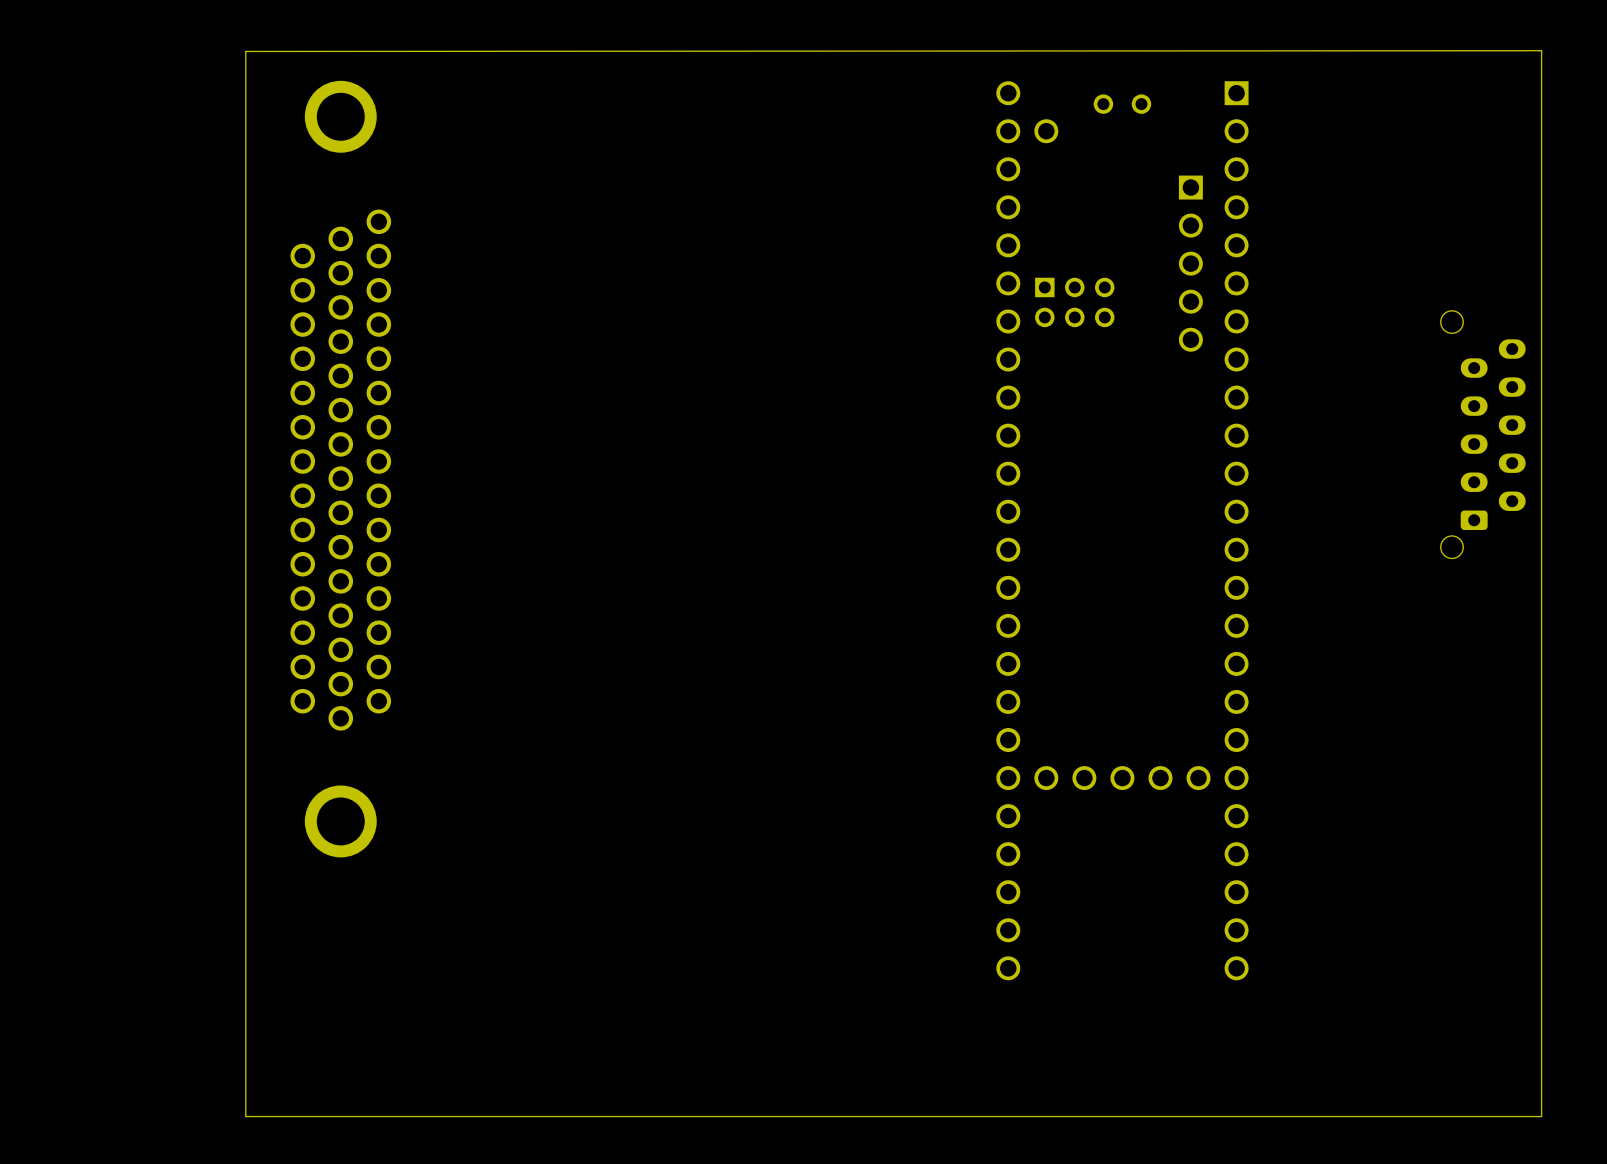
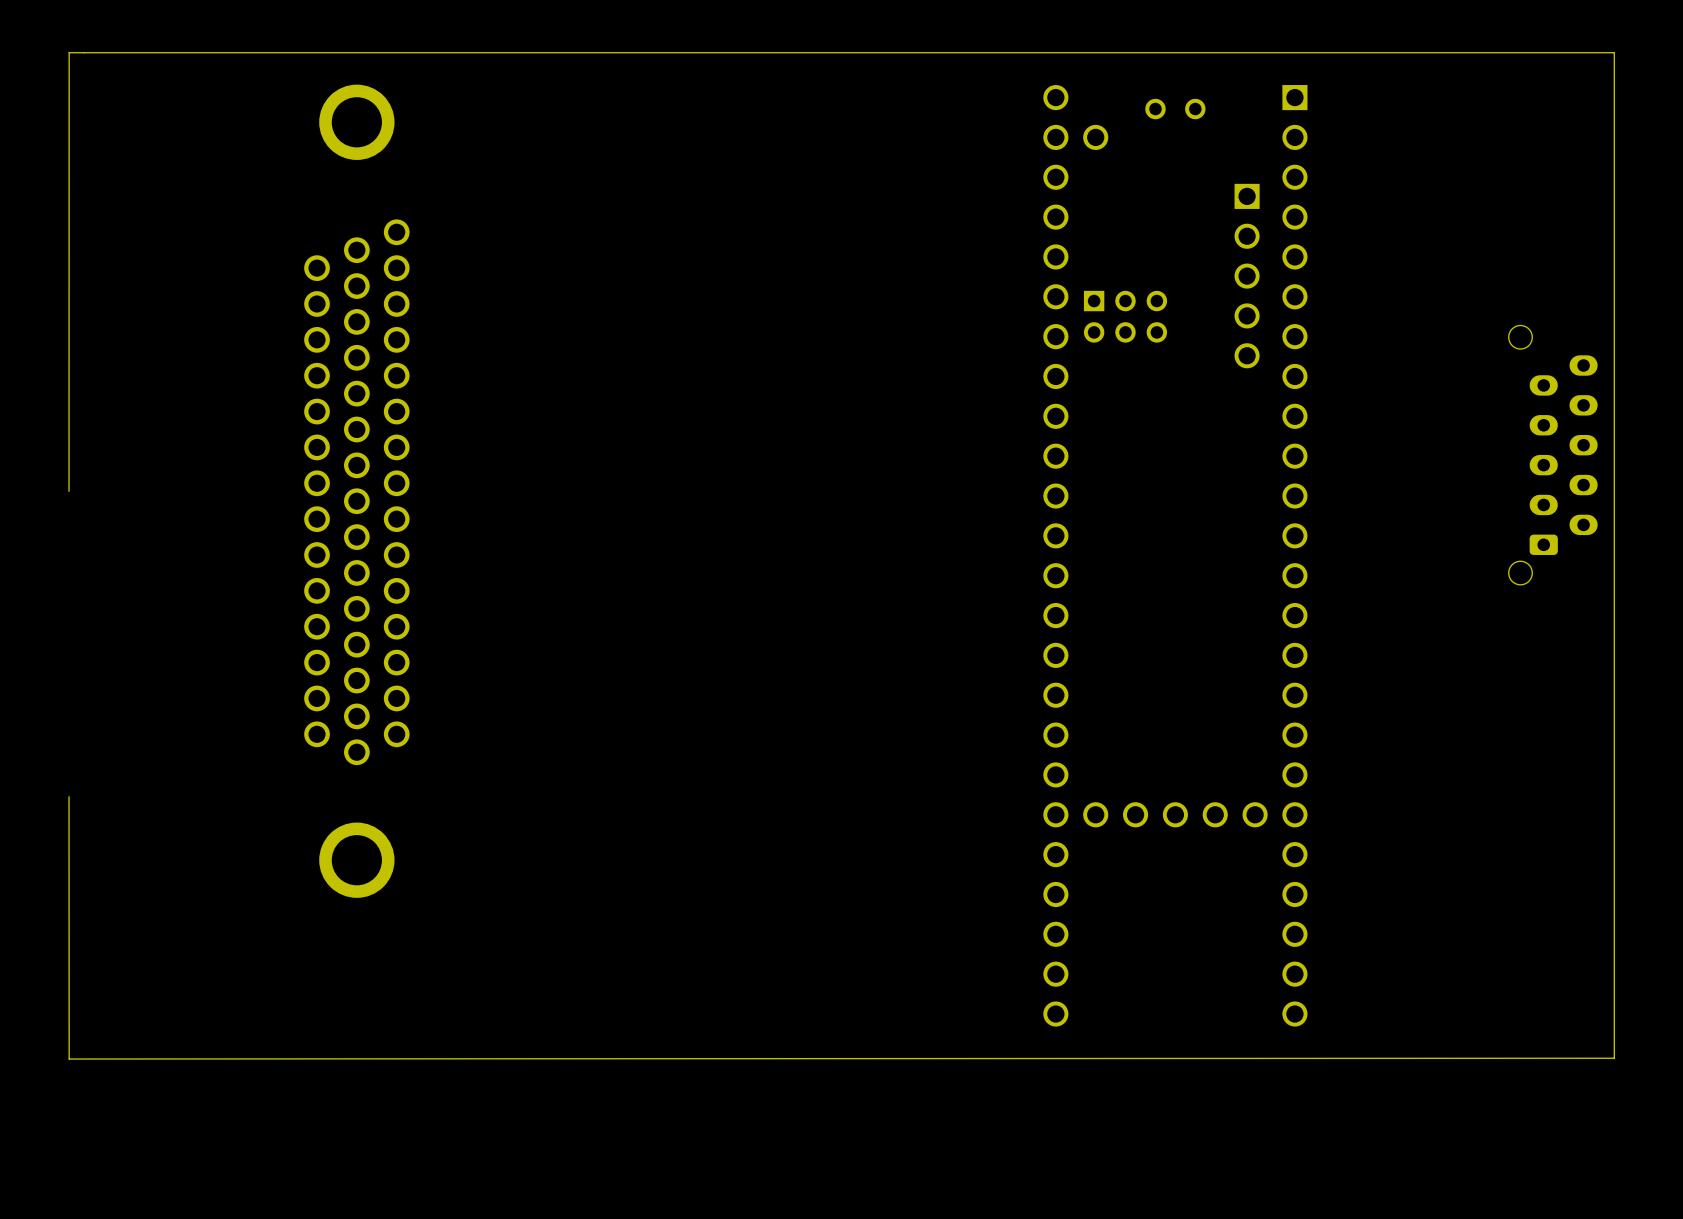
board edge: (1541, 50) (245, 51) (245, 1116) (1541, 1116) (1541, 1010) -> (1614, 53) (69, 52) (69, 491)
board edge: none -> (69, 796) (69, 1059) (1614, 1058)

